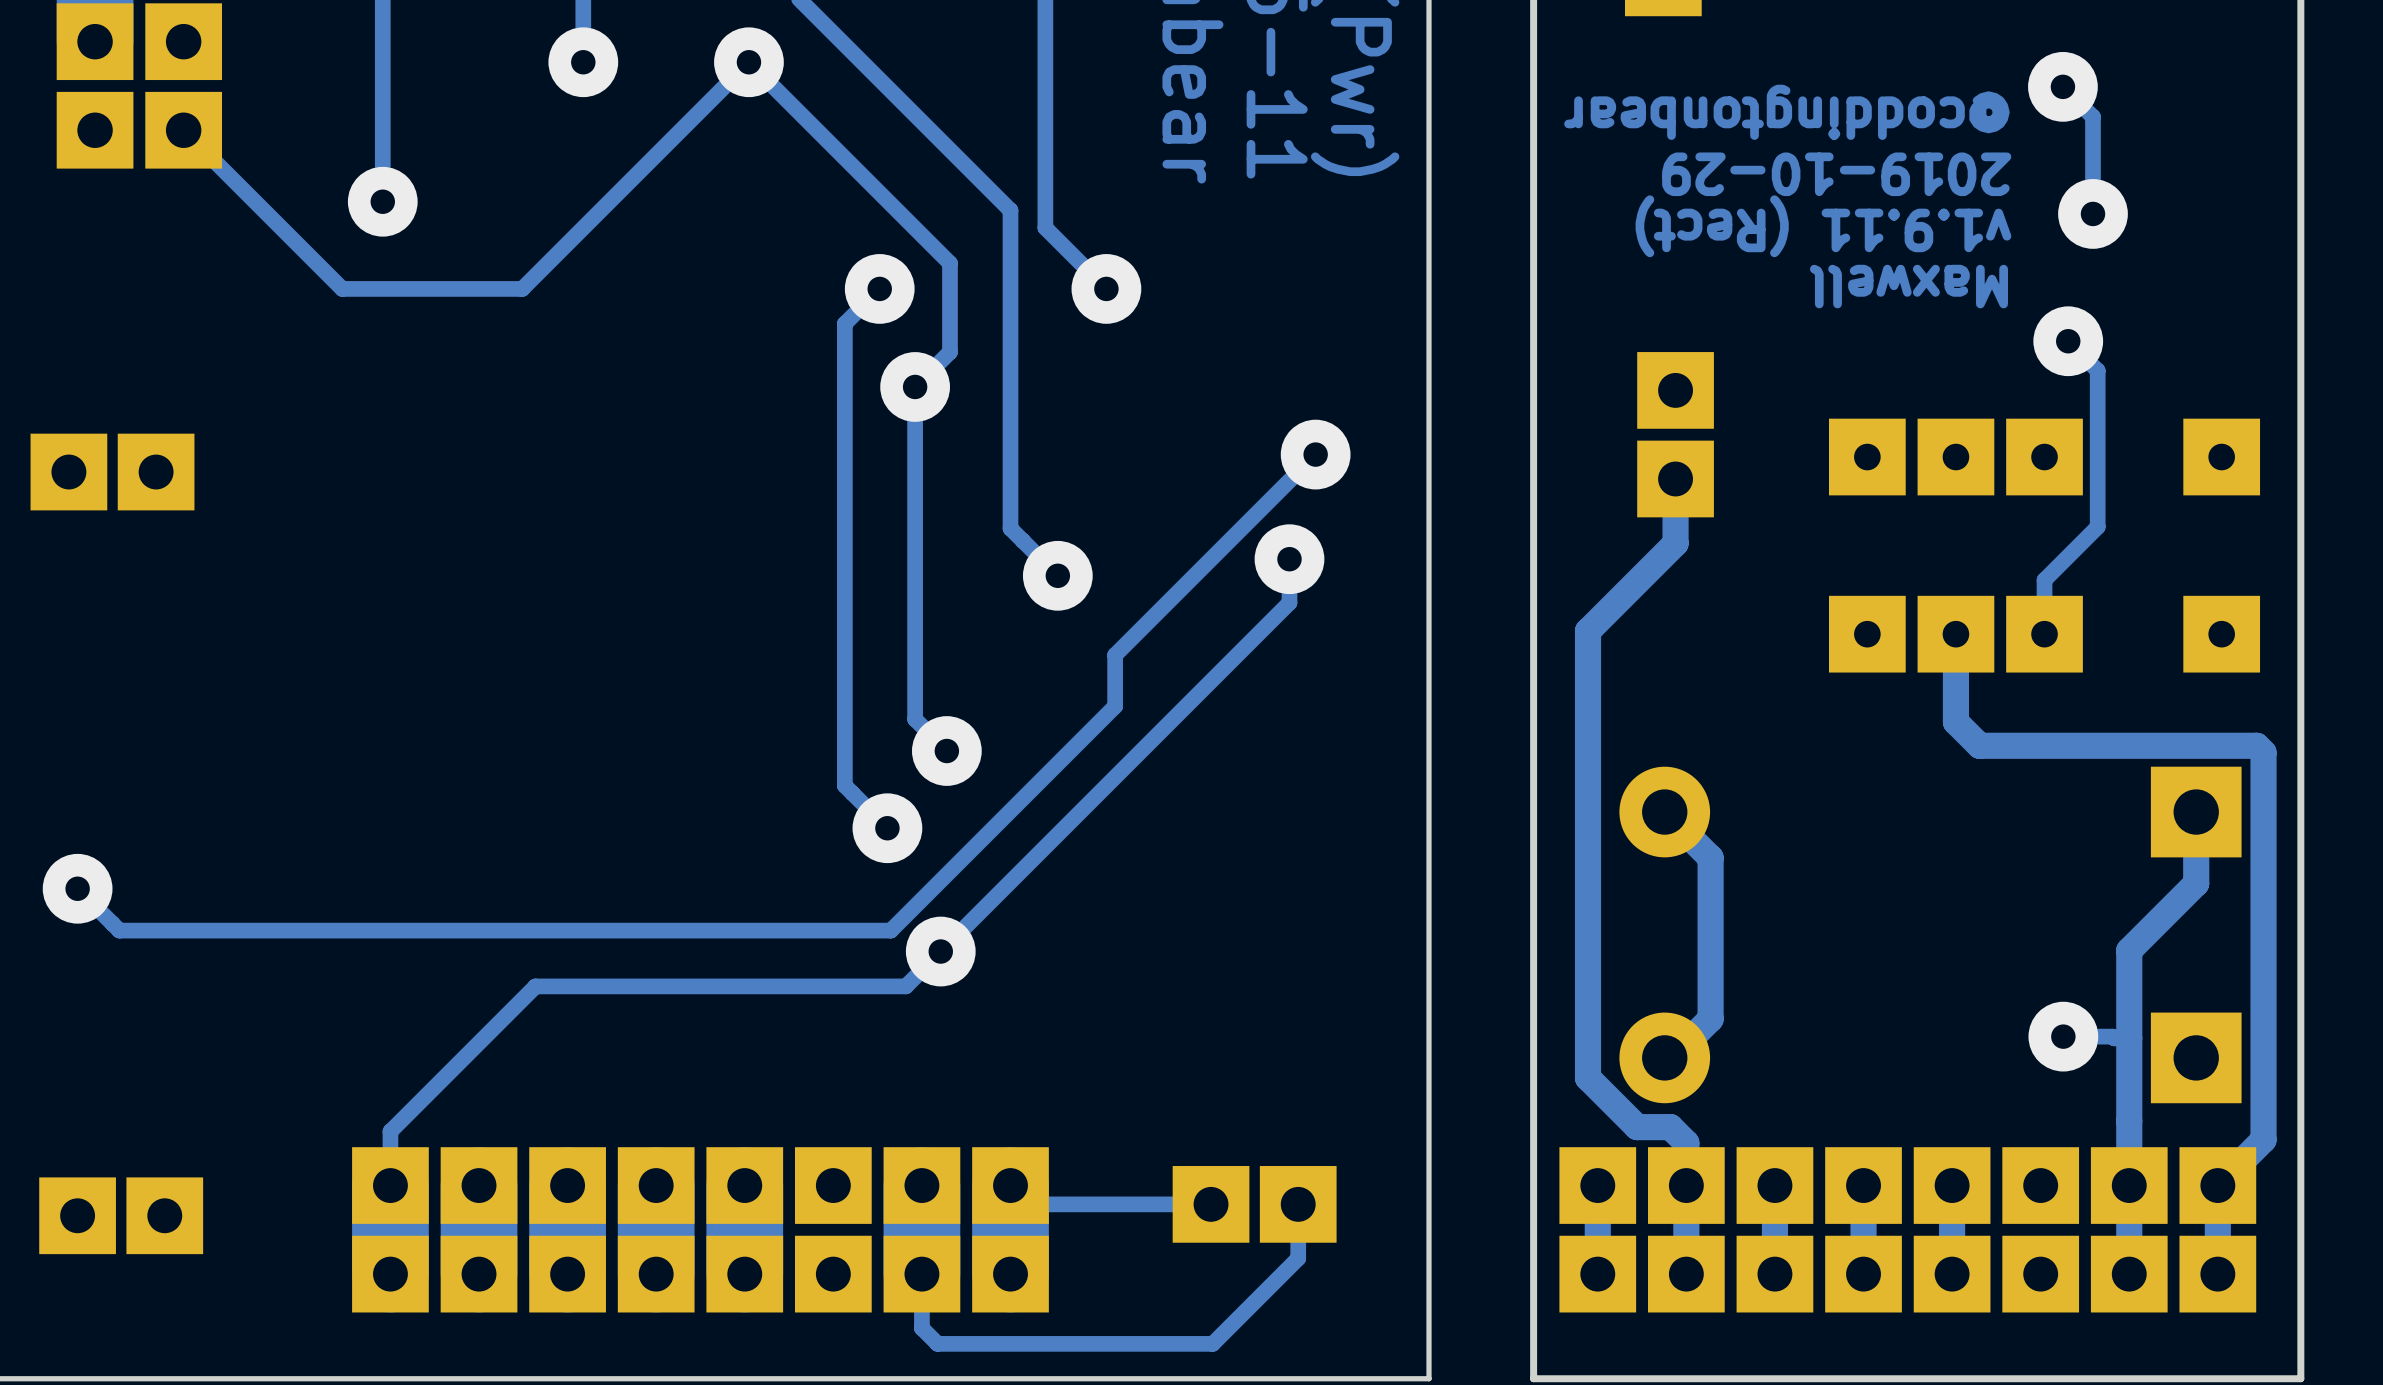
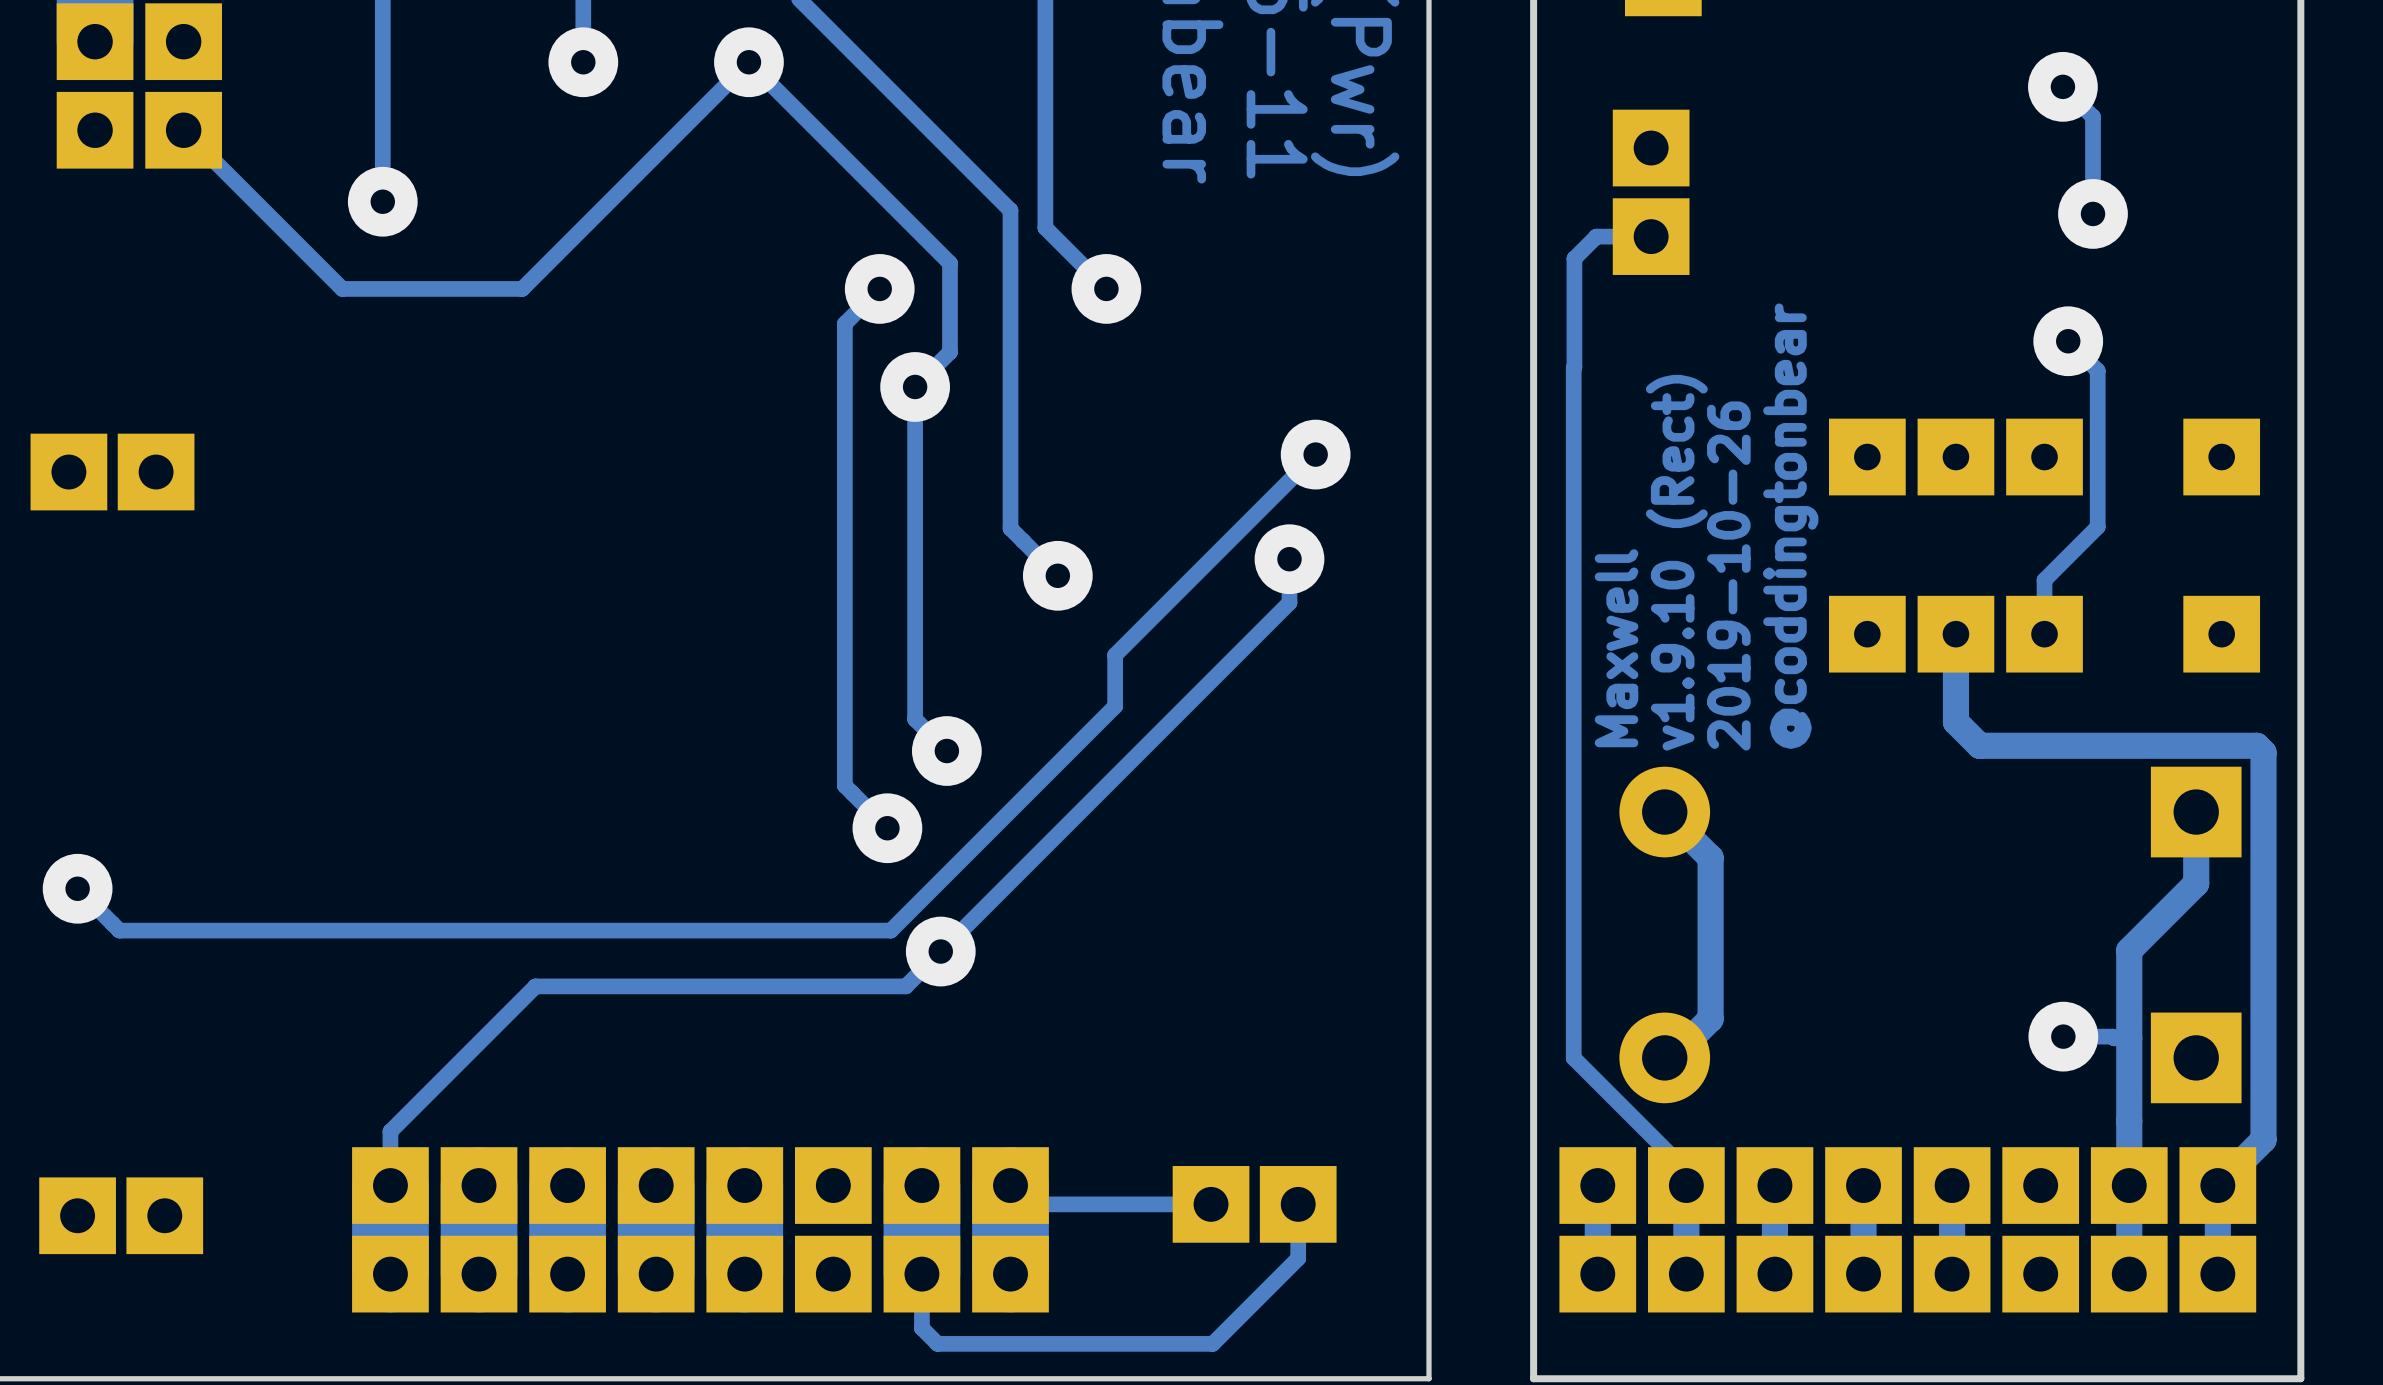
text rotation: 0° (1786, 112) -> 90° clockwise (1790, 526)
text: 2019-10-29 (1836, 174) -> none
text: v1.9.11 (Rect) (1823, 226) -> none
text rotation: 0° (1908, 286) -> 90° clockwise (1616, 648)
text position: Maxwell (1908, 286) -> Maxwell (1616, 648)
part position: (1675, 434) -> (1651, 192)
track: (1675, 478) (1675, 543) (1588, 631) (1588, 1077) (1637, 1127) (1670, 1127) (1686, 1142) (1686, 1170) -> (1651, 236) (1596, 236) (1574, 258) (1573, 1058) (1686, 1170)
text: none -> v1.9.10 (Rect) (1676, 562)
text: none -> 2019-10-26 (1728, 576)

